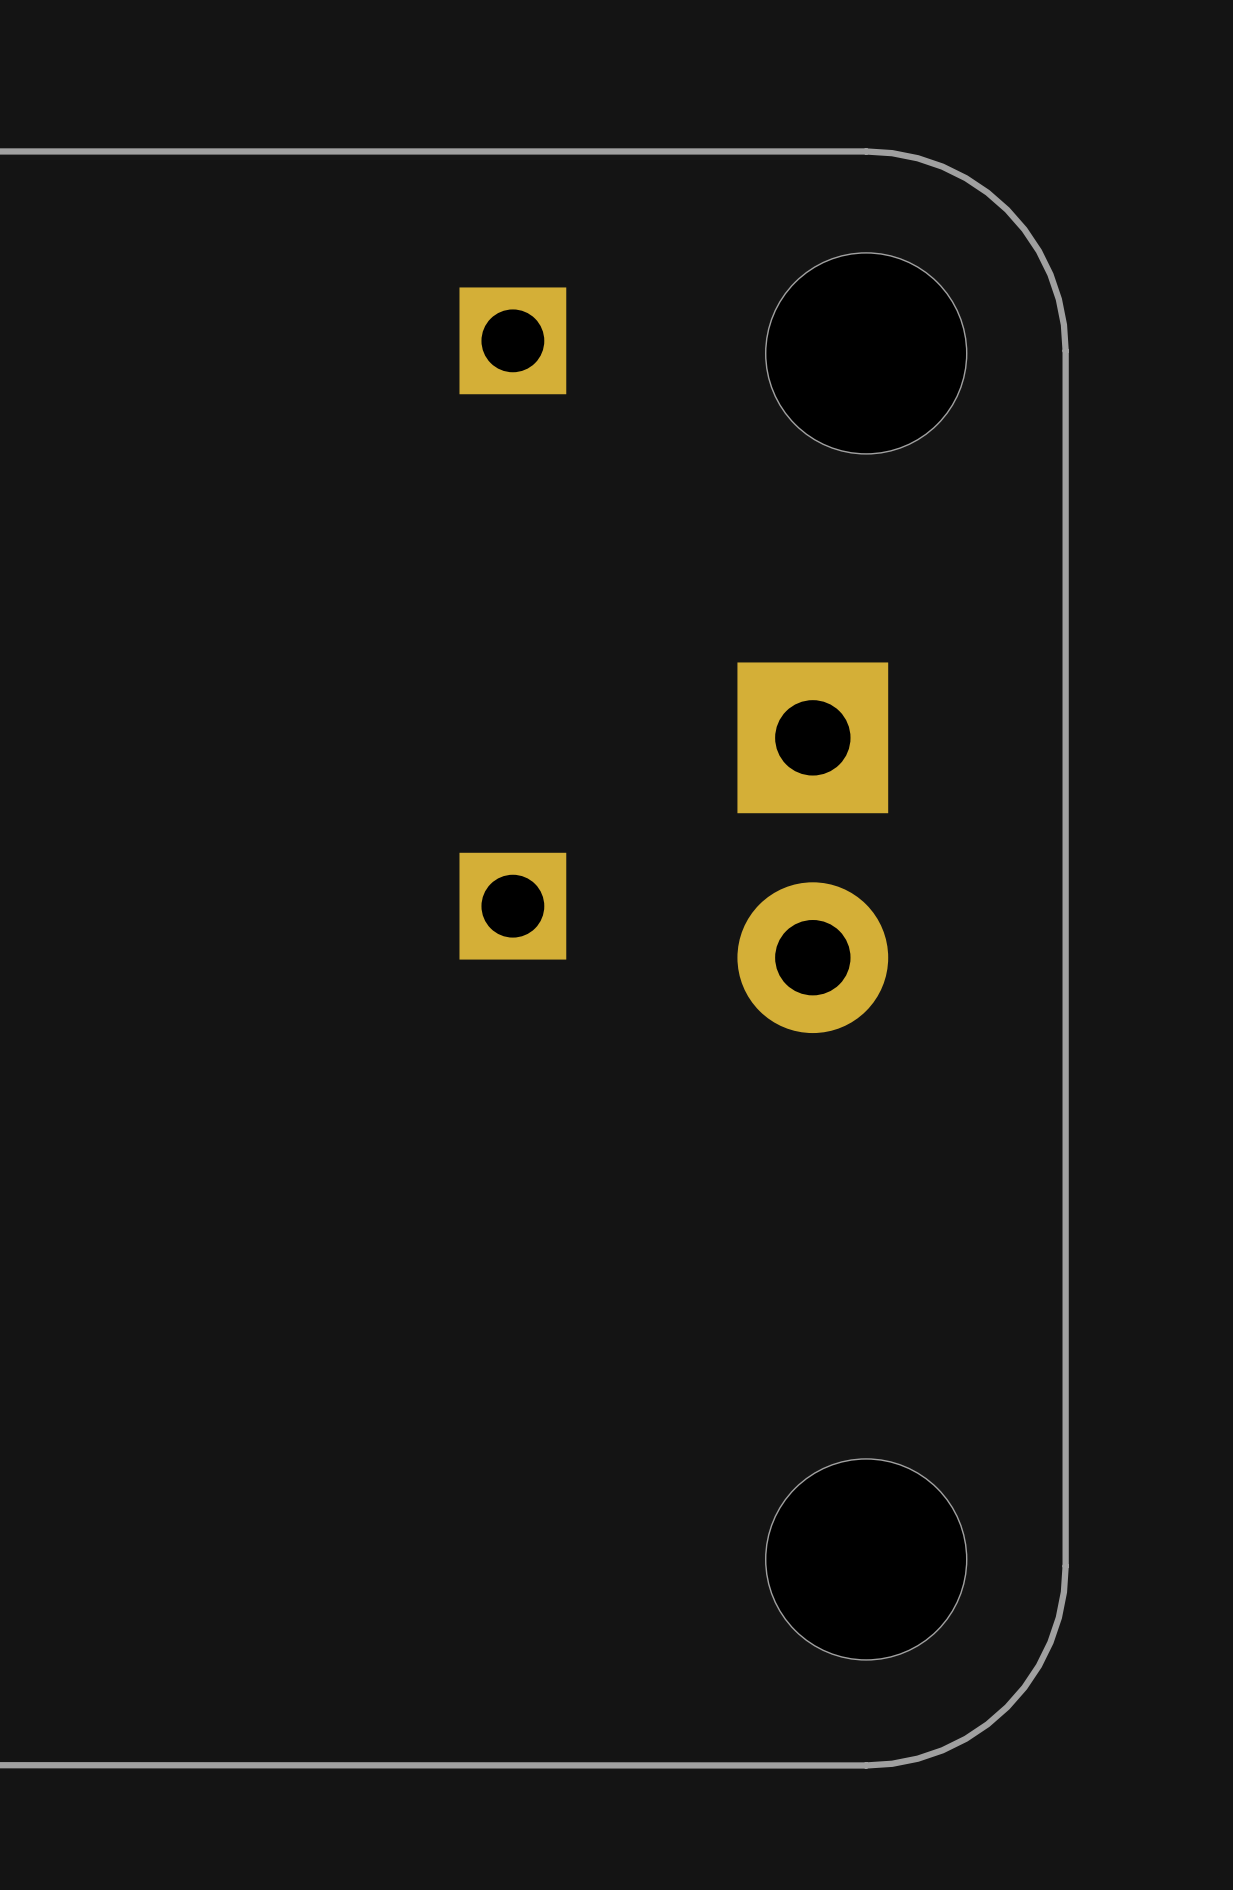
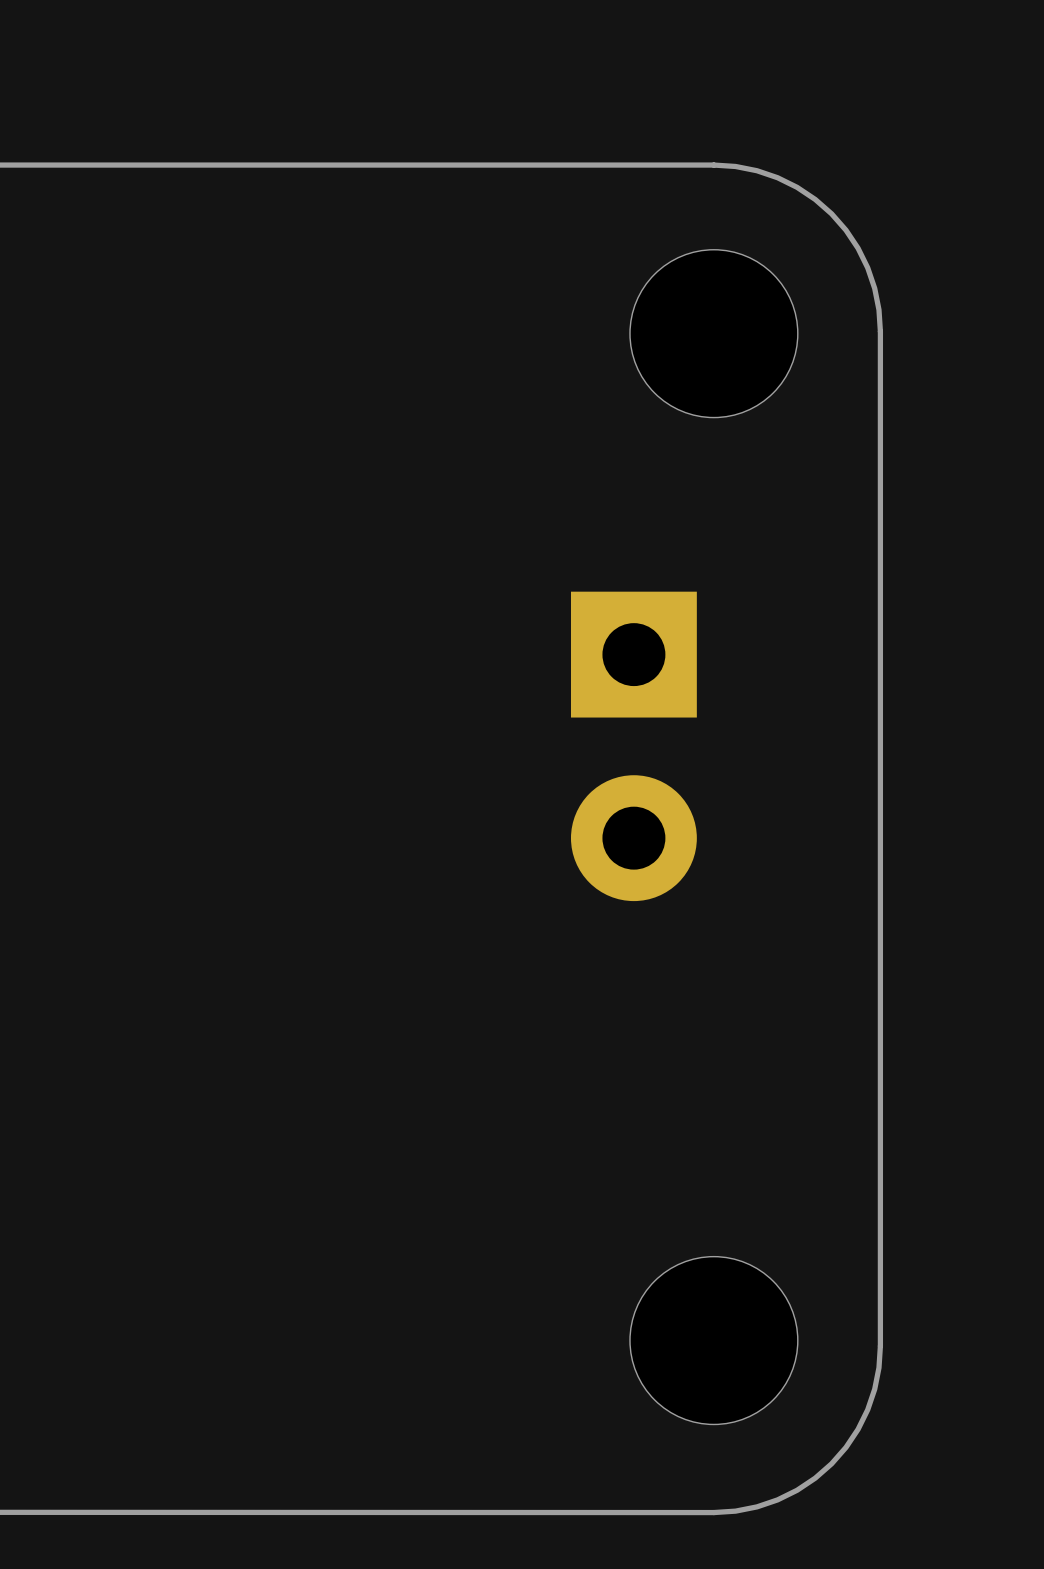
part: (512, 340) -> none
part position: (812, 847) -> (633, 746)
part: (512, 906) -> none

